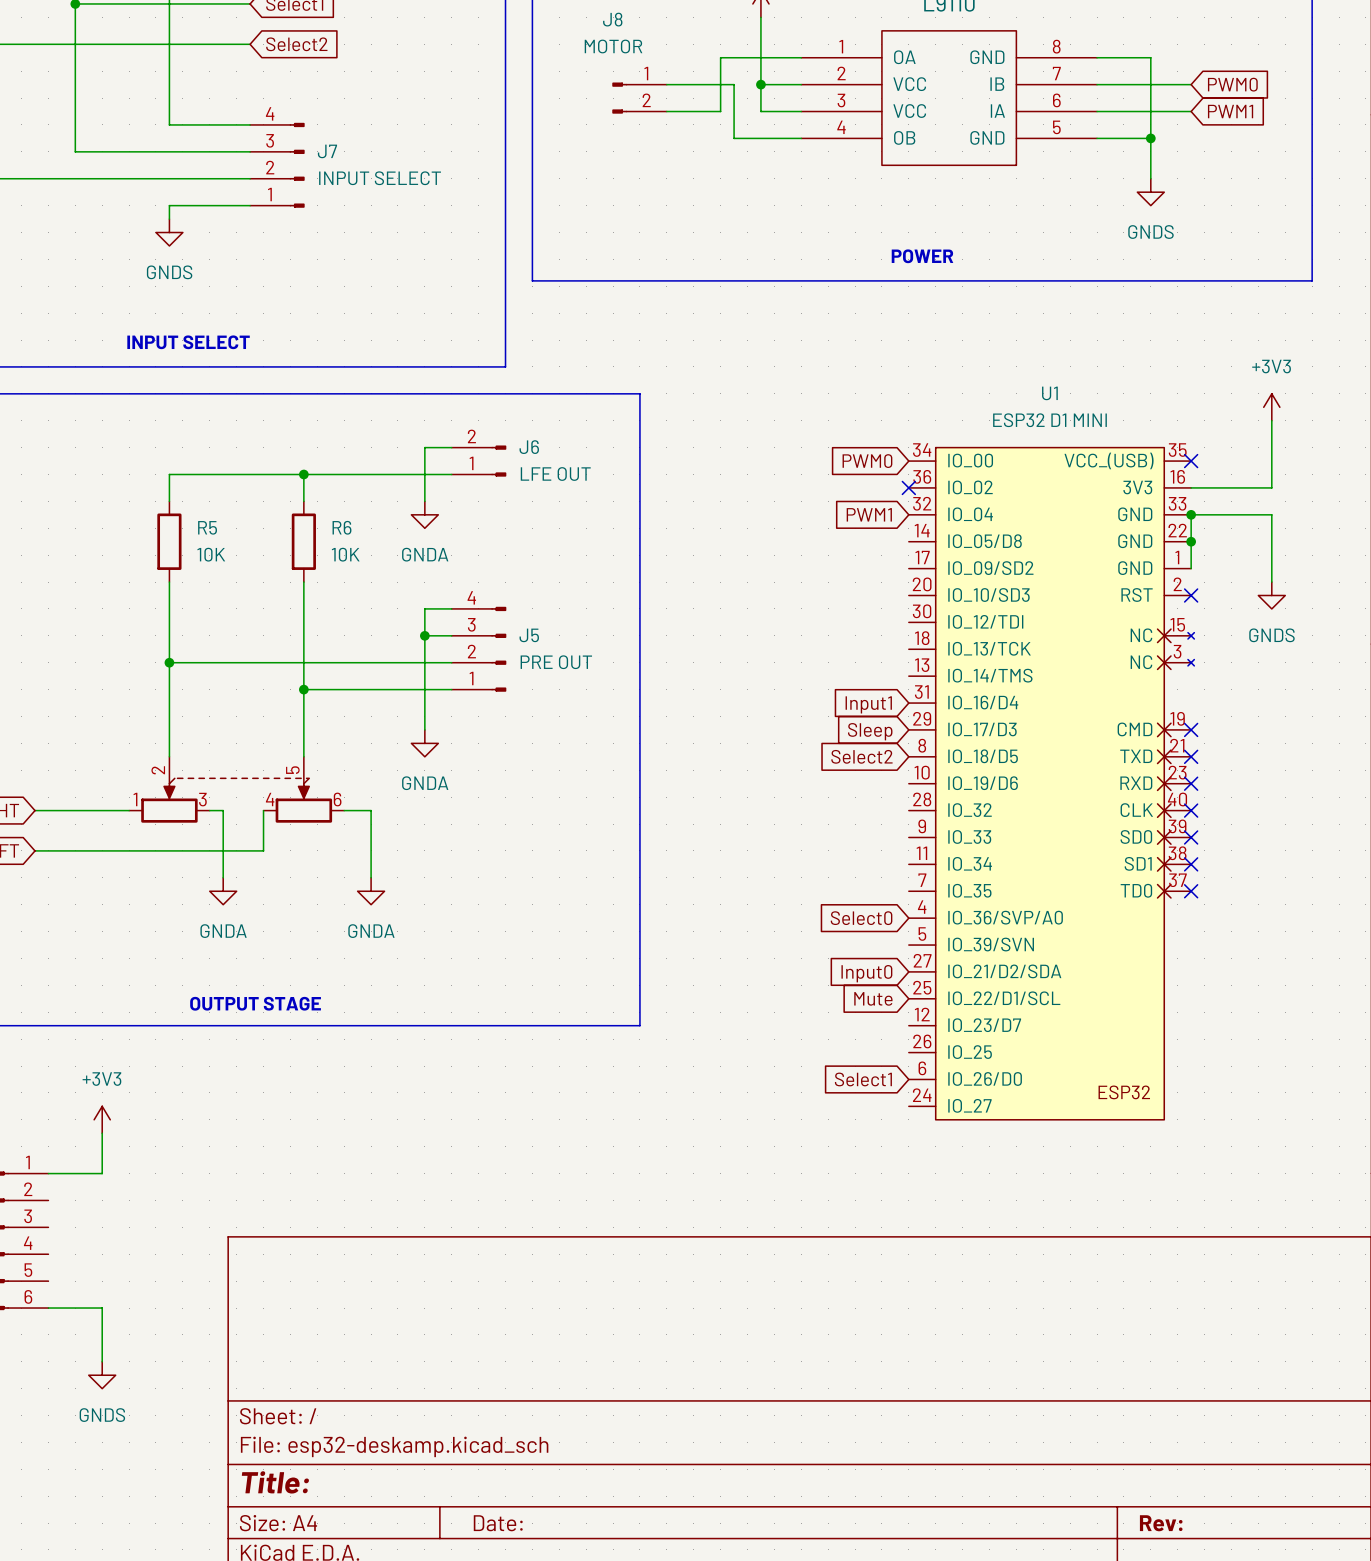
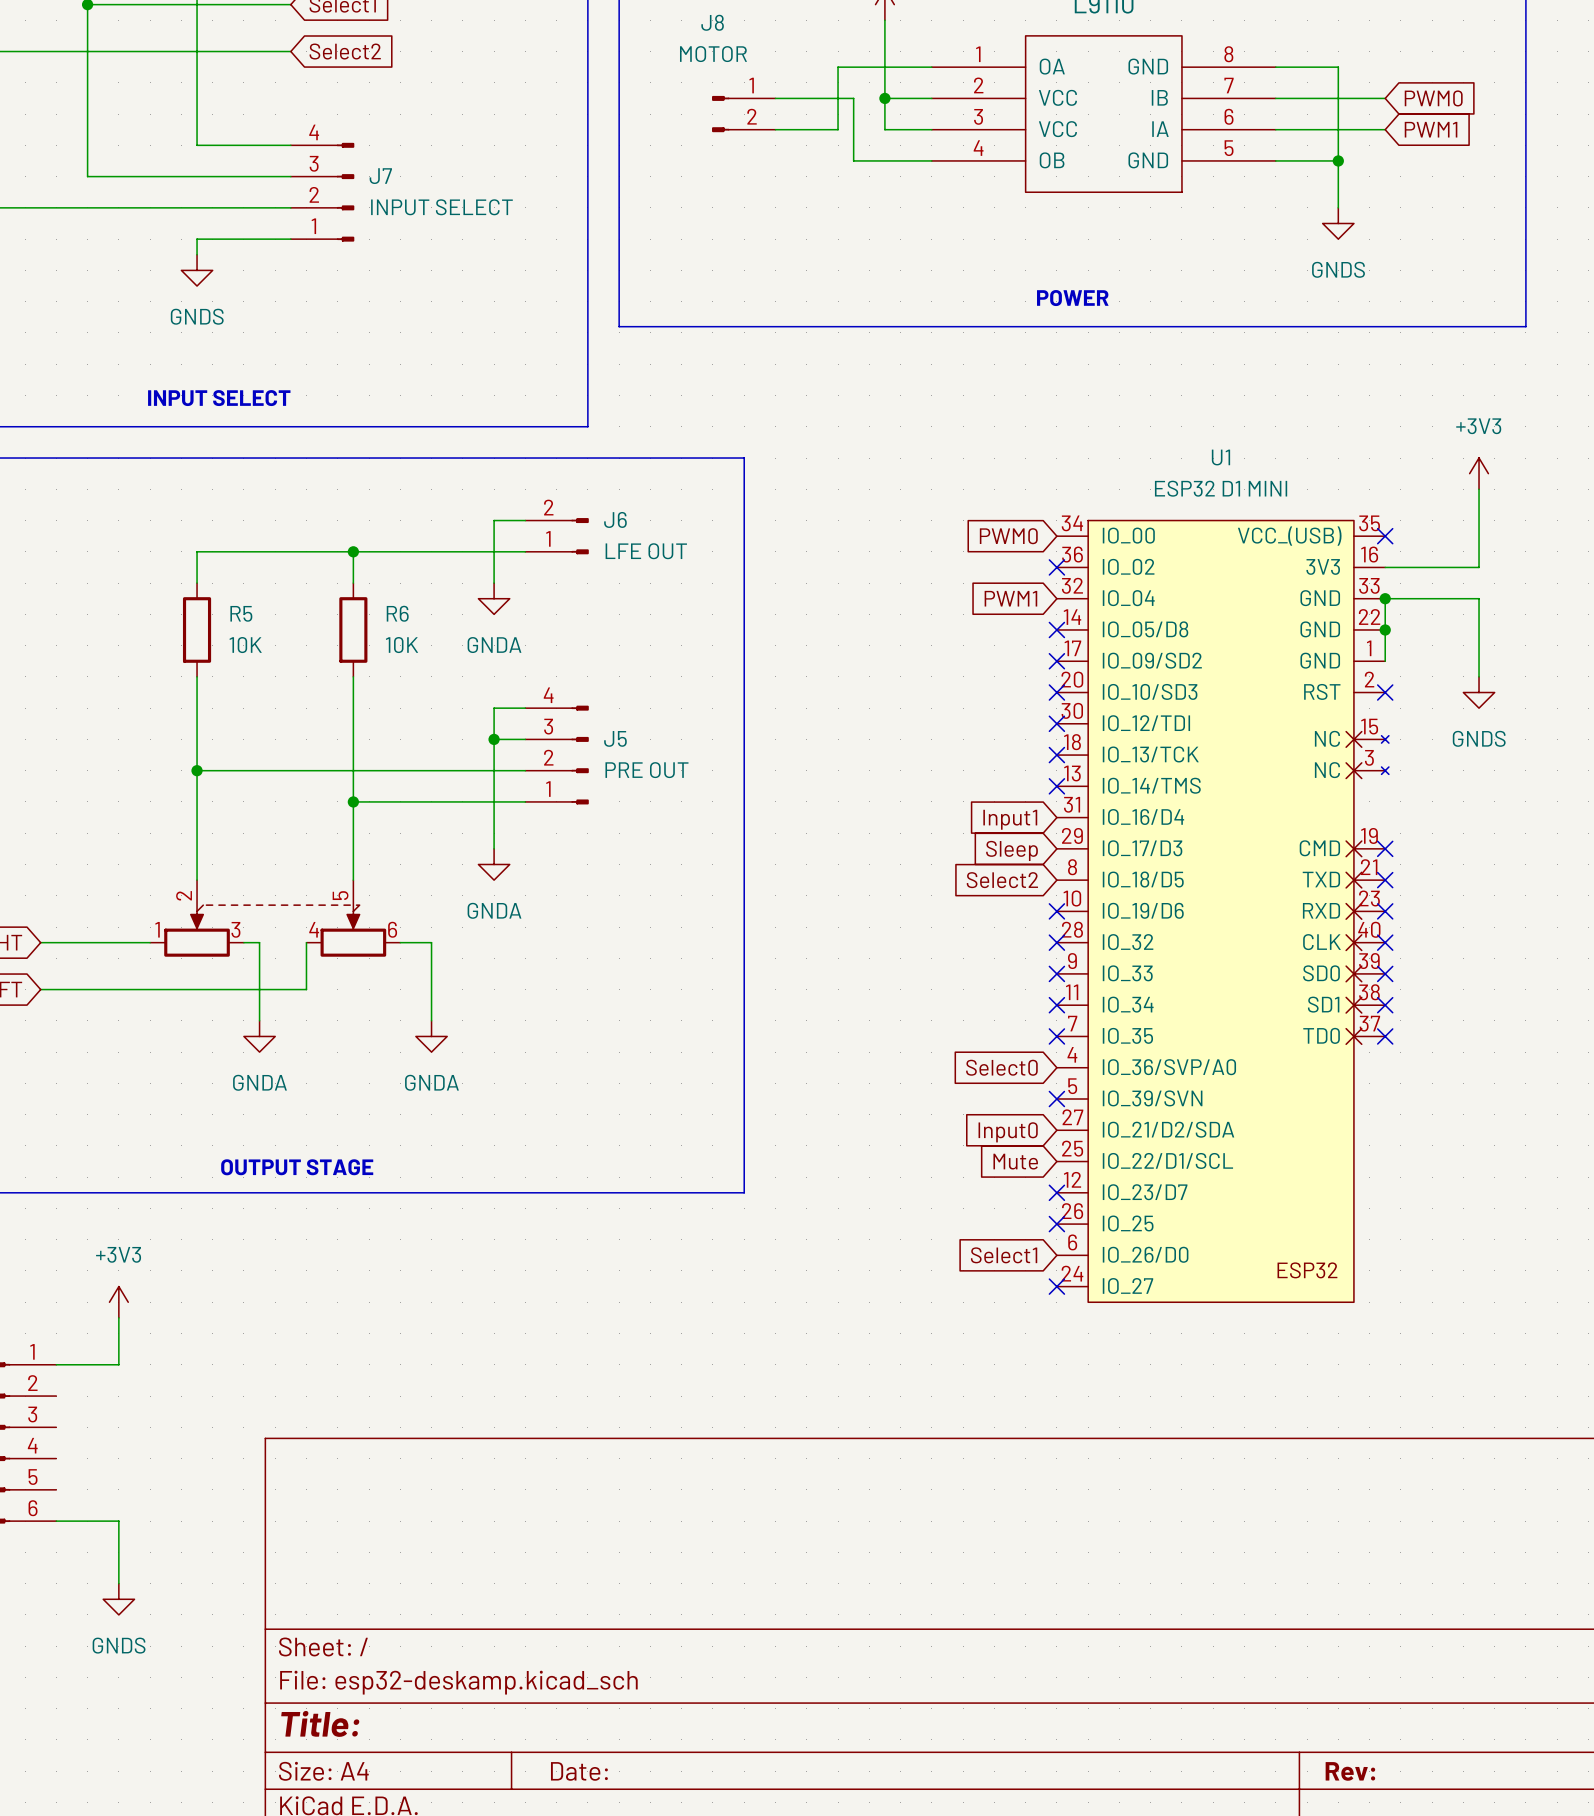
no-connect mark: none -> (1056, 629)
no-connect mark: none -> (1056, 661)
no-connect mark: none -> (1056, 692)
no-connect mark: none -> (1056, 723)
no-connect mark: none -> (1056, 755)
no-connect mark: none -> (1056, 786)
no-connect mark: none -> (1056, 911)
no-connect mark: none -> (1056, 942)
no-connect mark: none -> (1056, 973)
no-connect mark: none -> (1056, 1005)
no-connect mark: none -> (1056, 1036)
no-connect mark: none -> (1056, 1099)
no-connect mark: none -> (1056, 1192)
no-connect mark: none -> (1056, 1224)
no-connect mark: none -> (1056, 1286)

